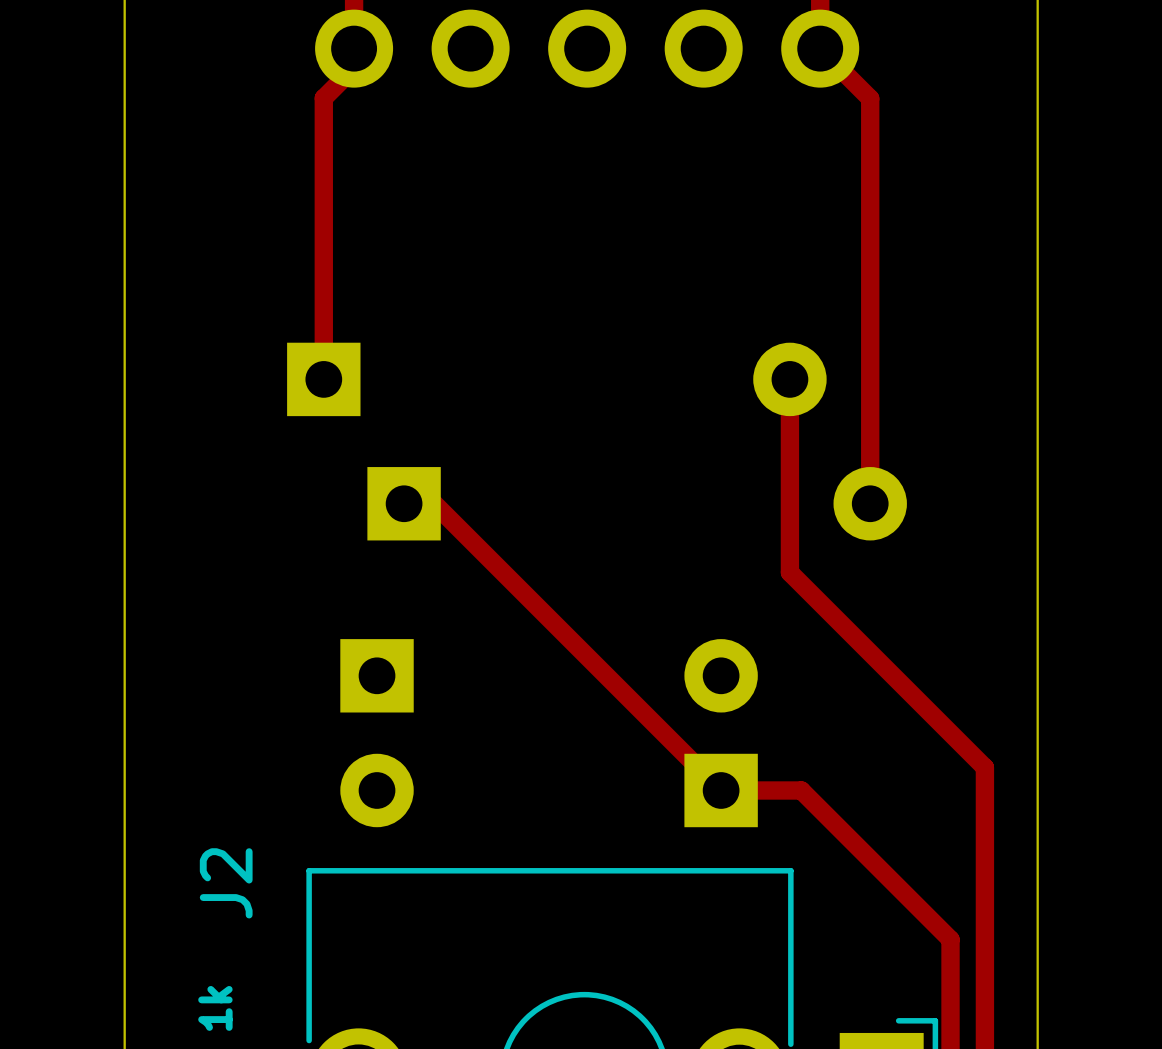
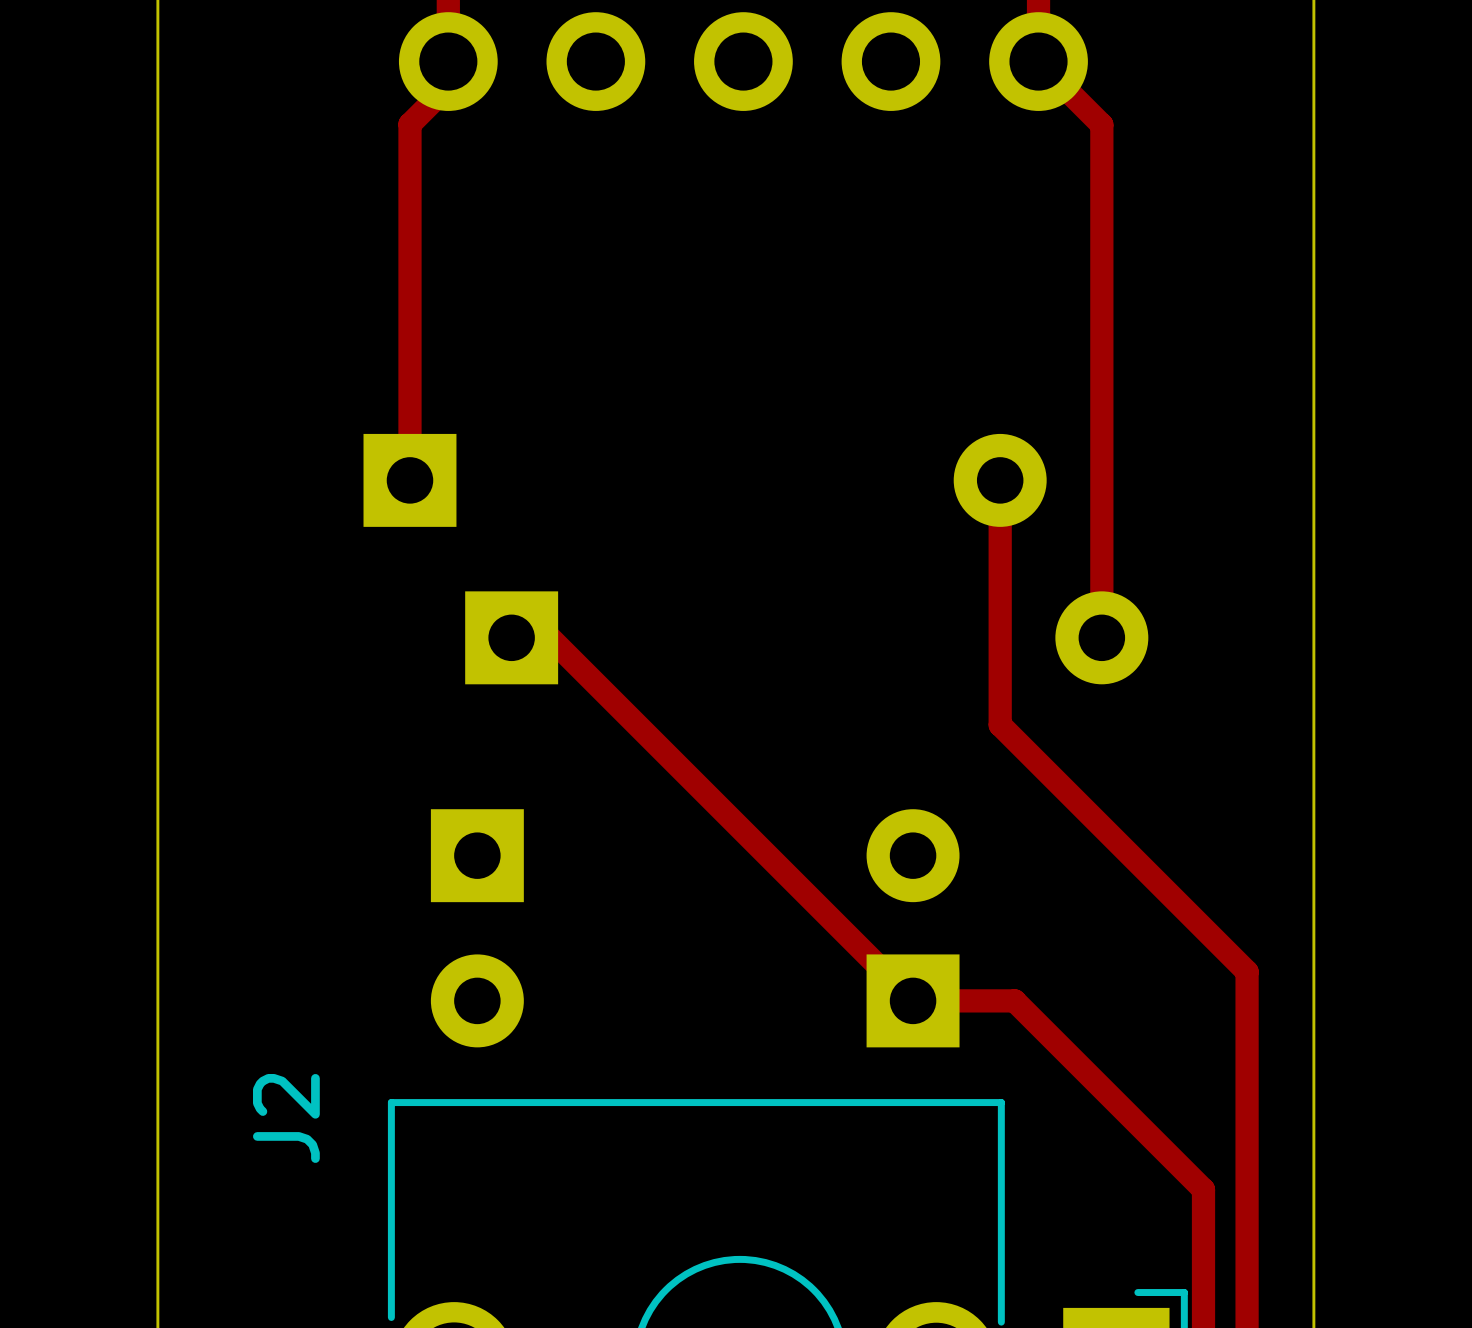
part value: 1k (215, 1008) -> none

